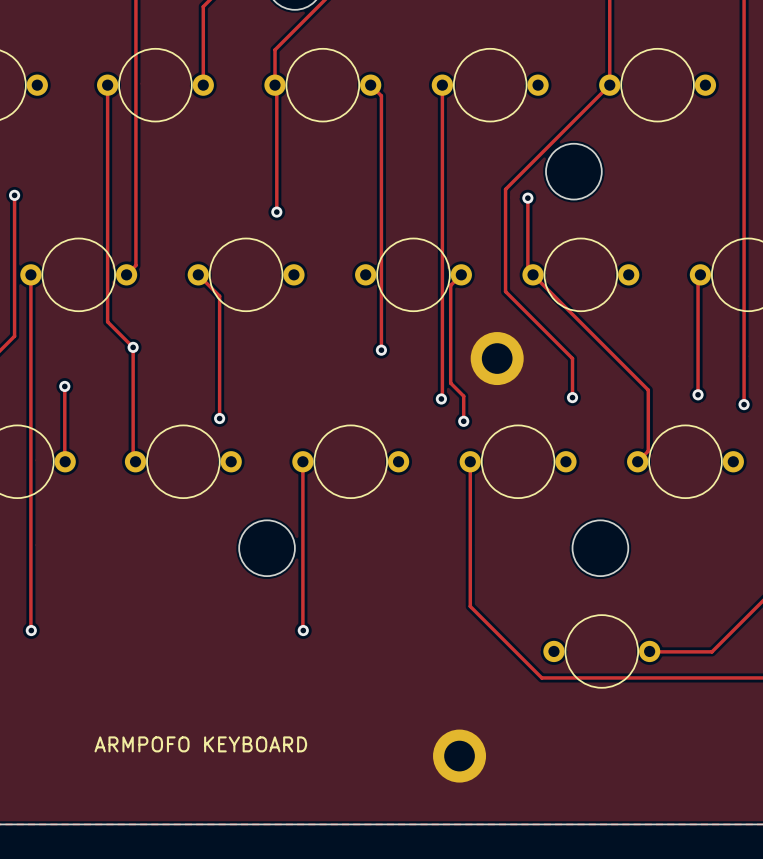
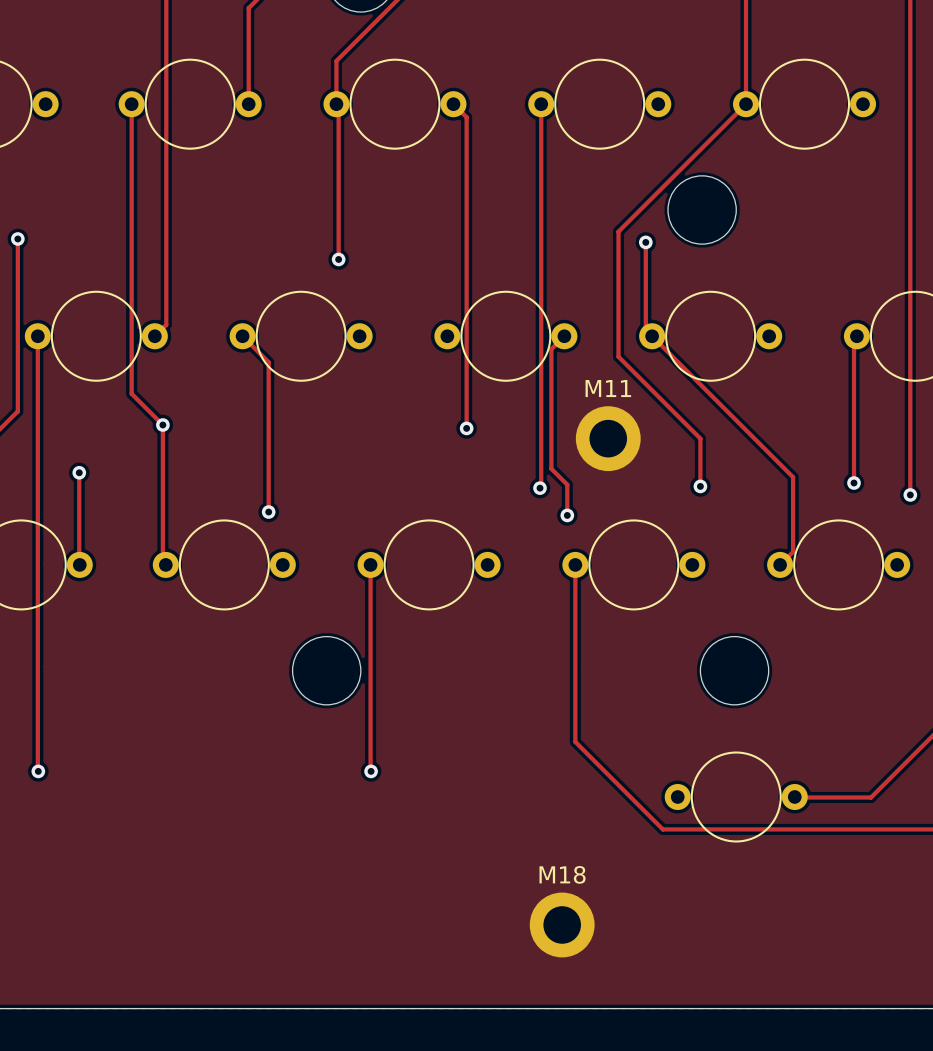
M11 name: none -> M11 (608, 388)
M18 name: none -> M18 (562, 874)
text: ARMPOFO KEYBOARD (200, 744) -> none

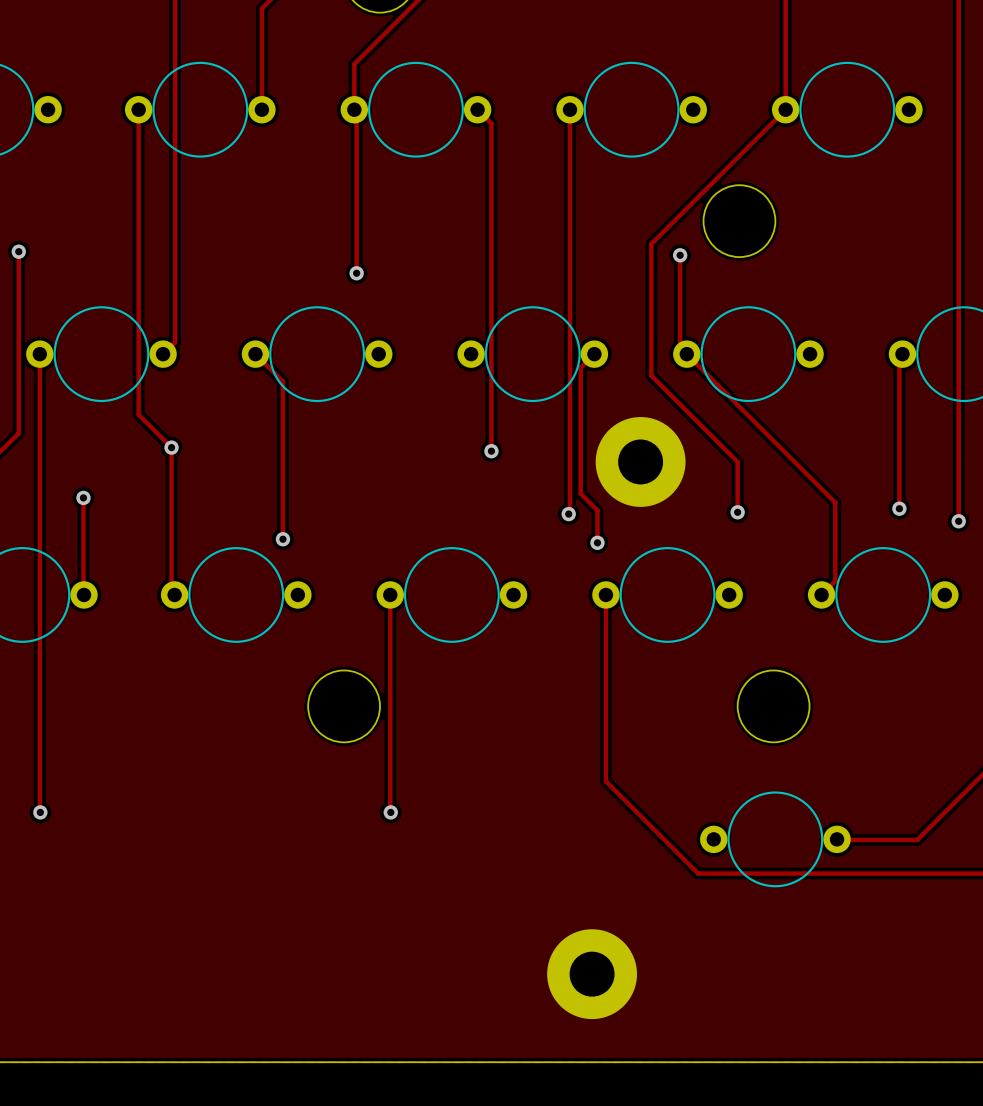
M11: (608, 438) -> none
part: none -> (640, 461)
M18: (562, 924) -> none
part: none -> (592, 974)

